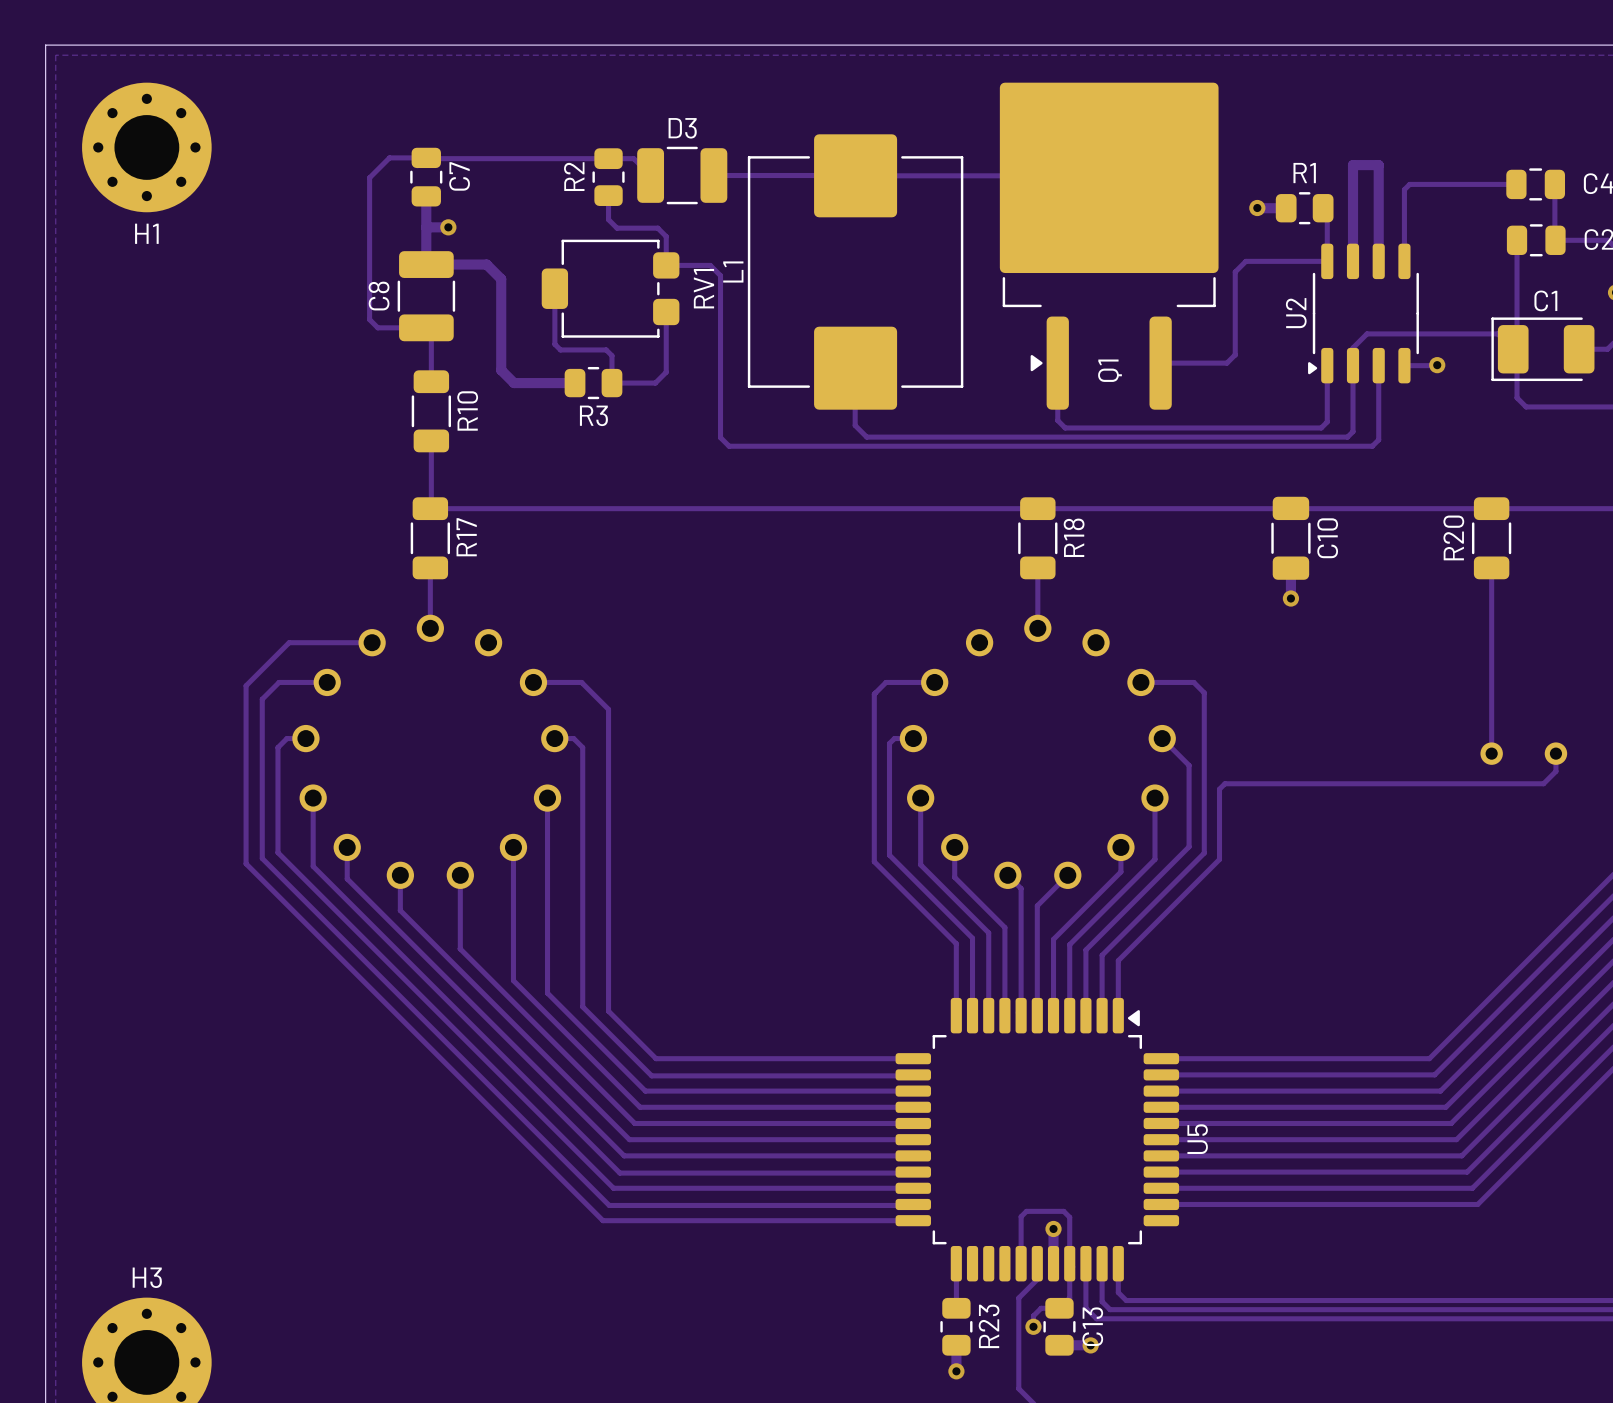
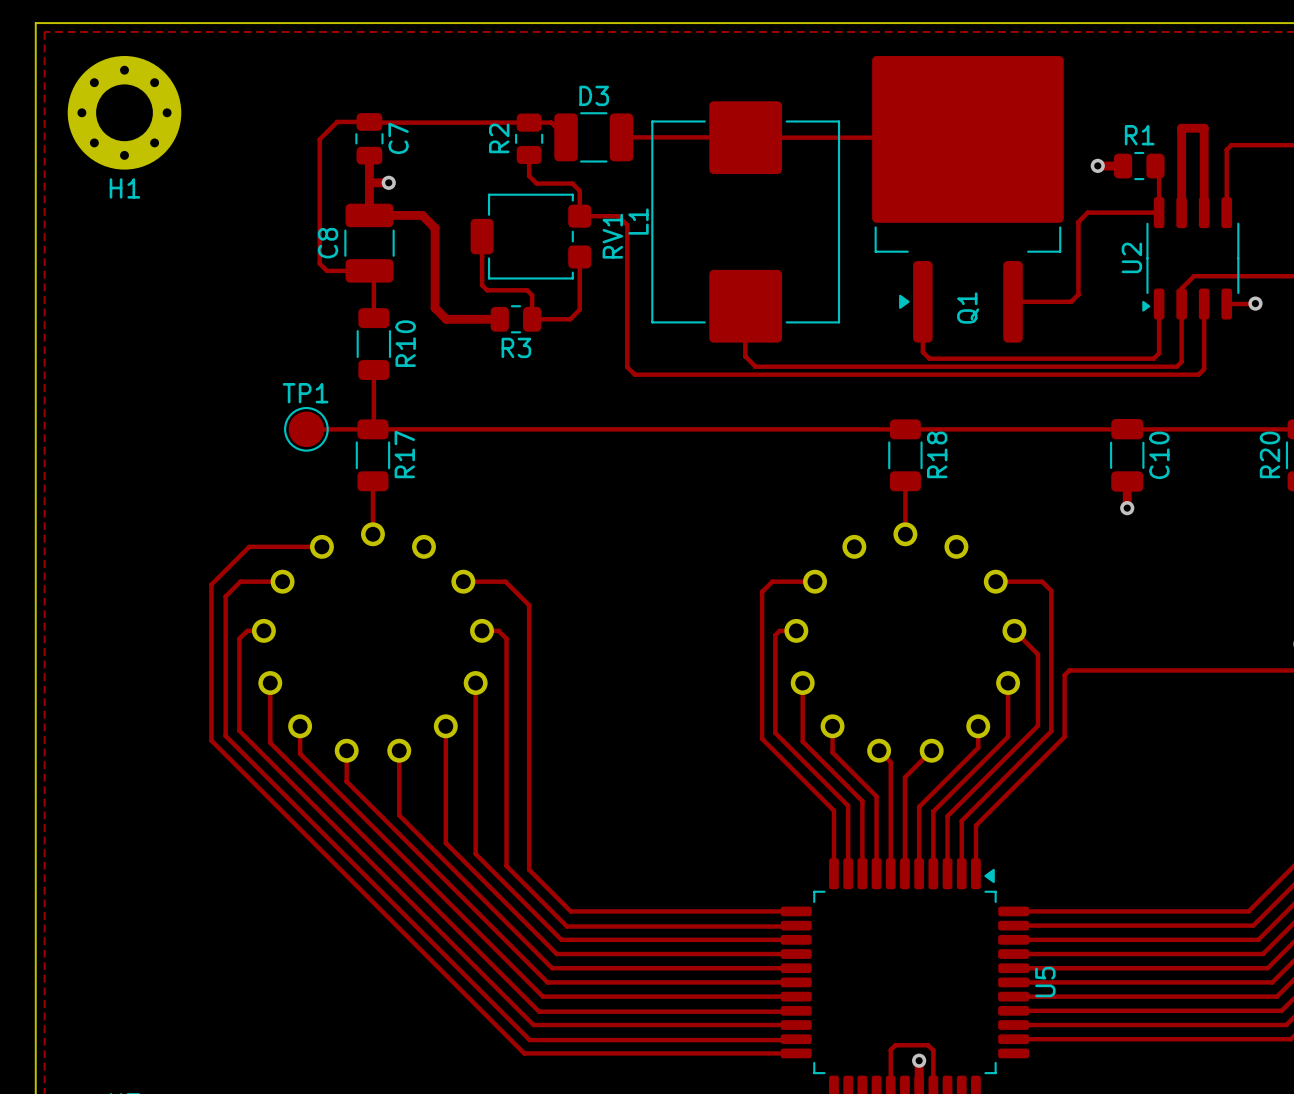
track: none -> (306, 429) (372, 429)
TP1: none -> (306, 429)

